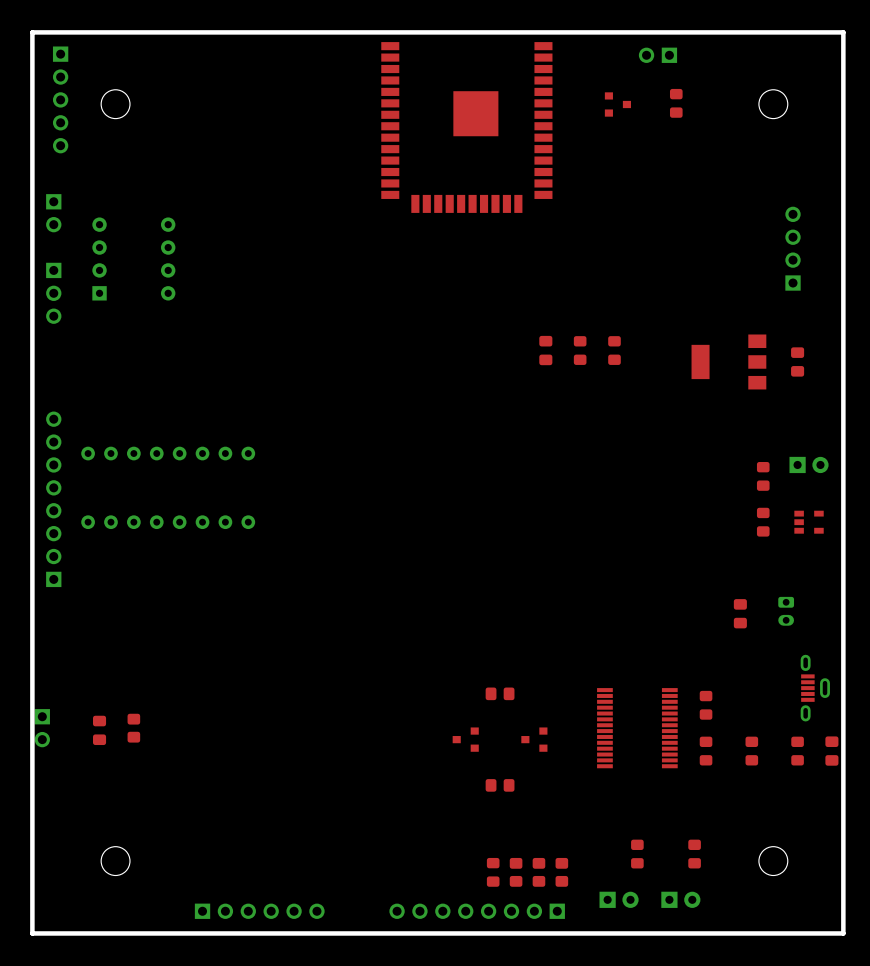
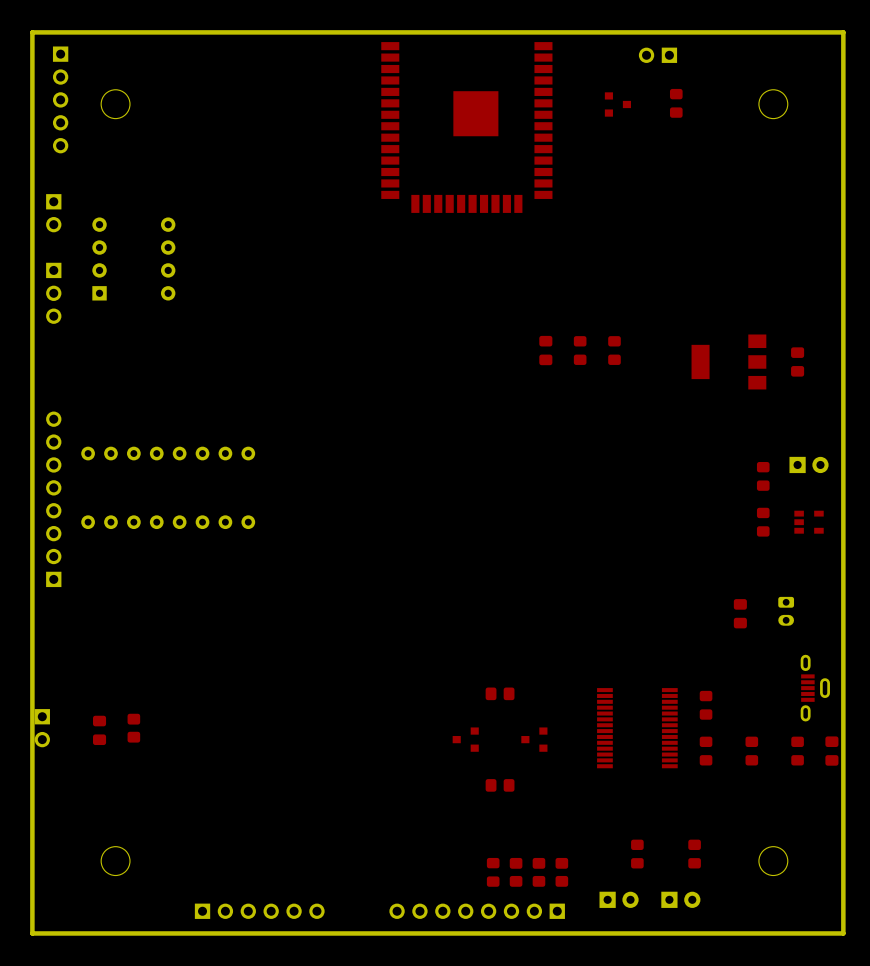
part: (793, 248) -> none

